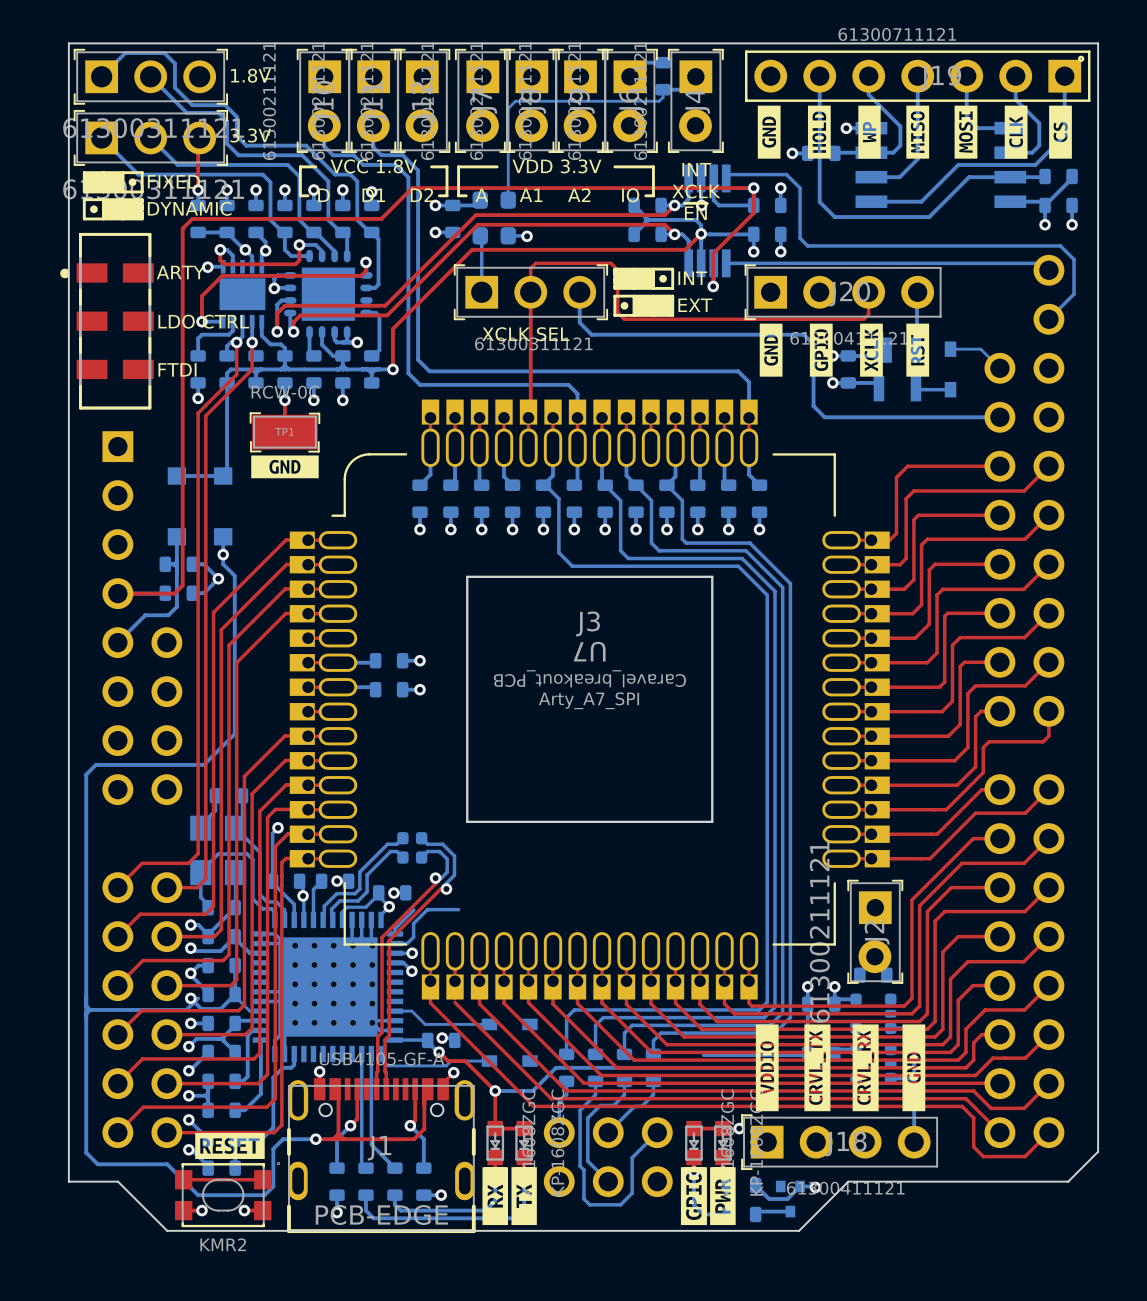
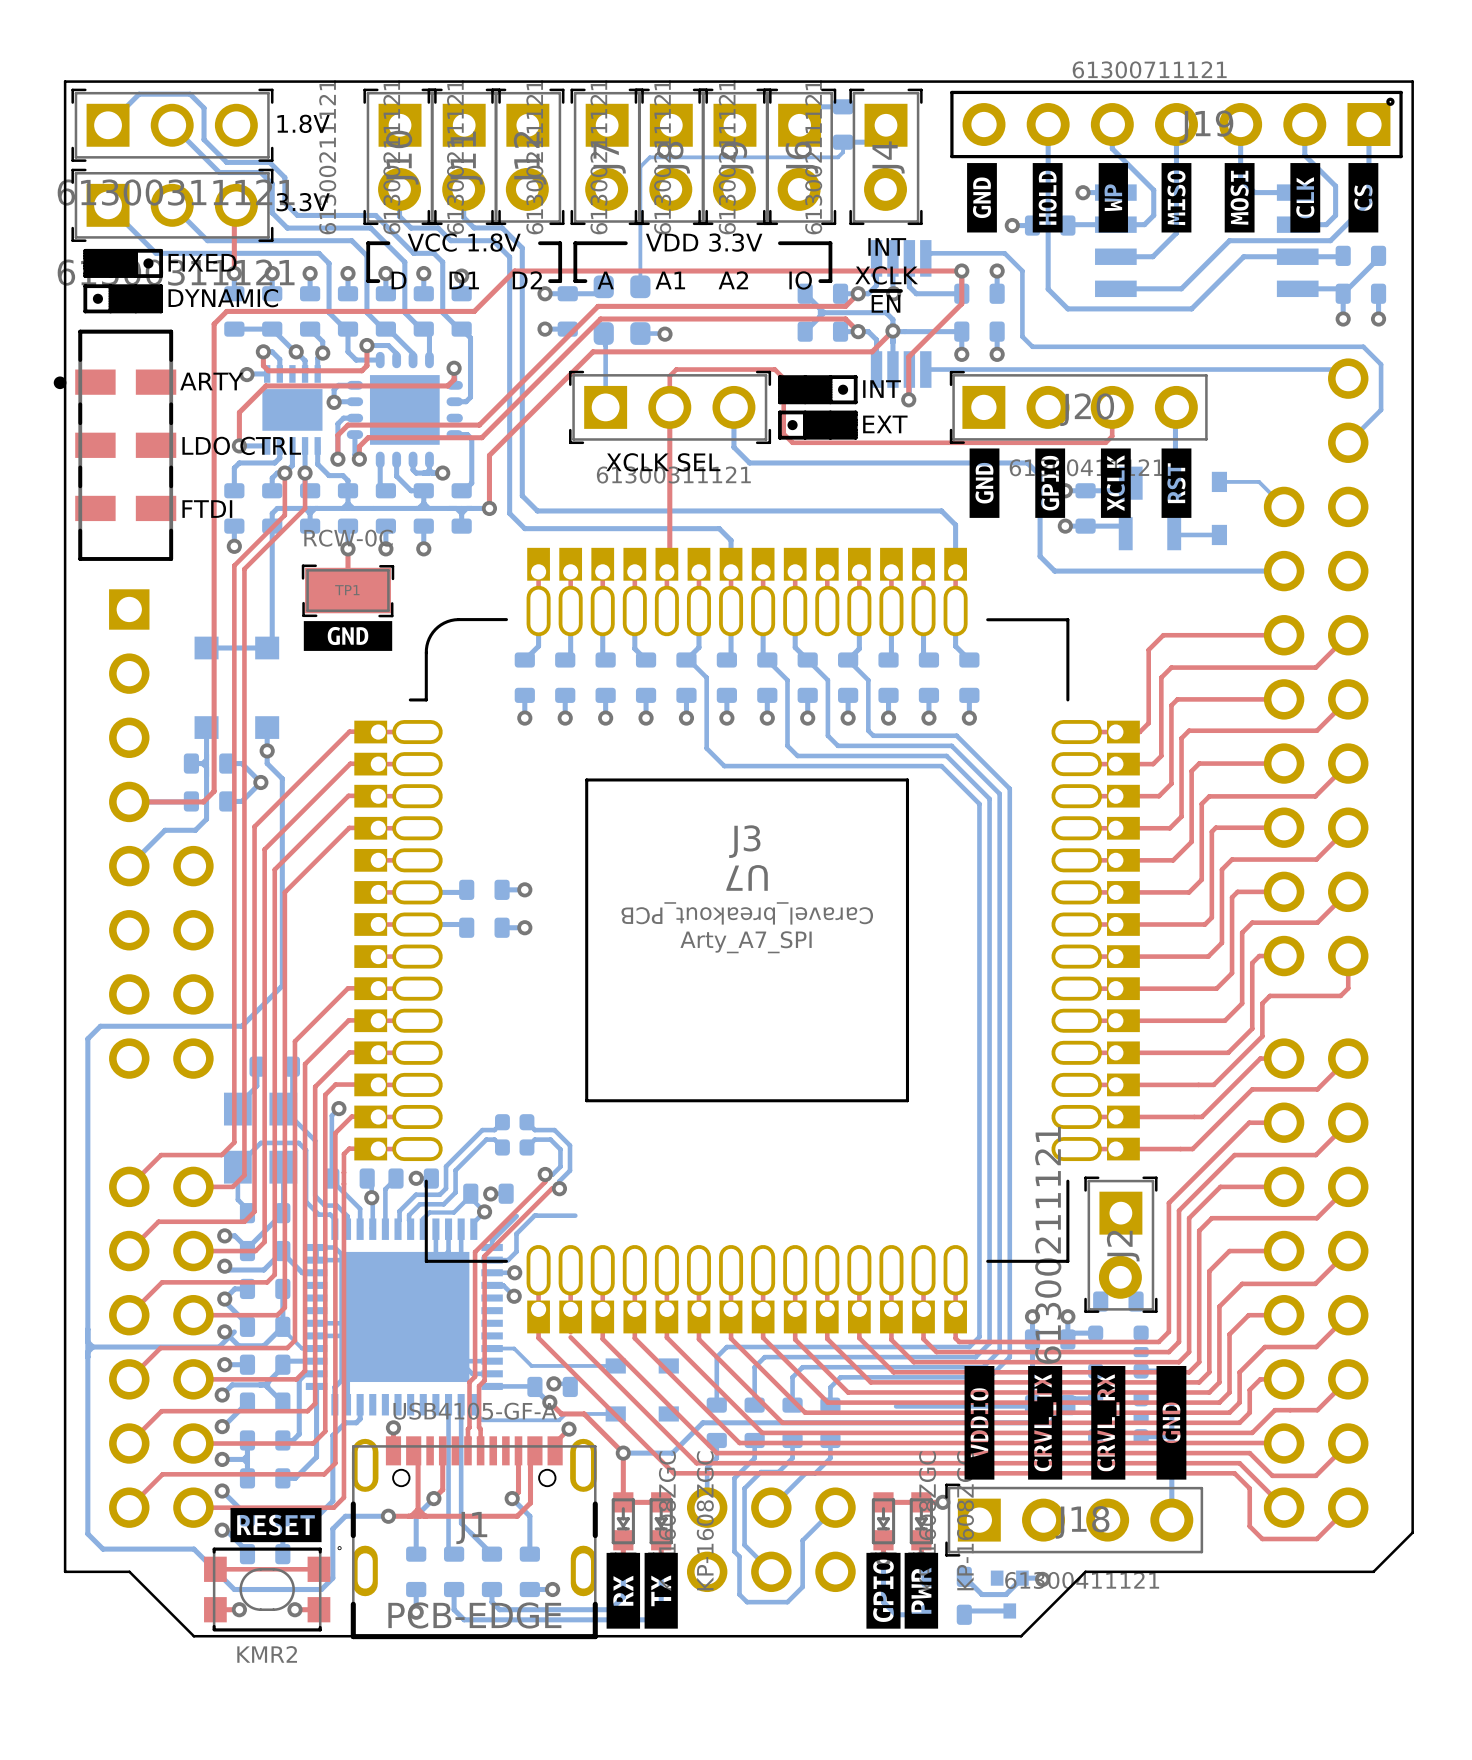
part footprint: [252, 911, 404, 1063] -> [305, 1218, 503, 1416]

